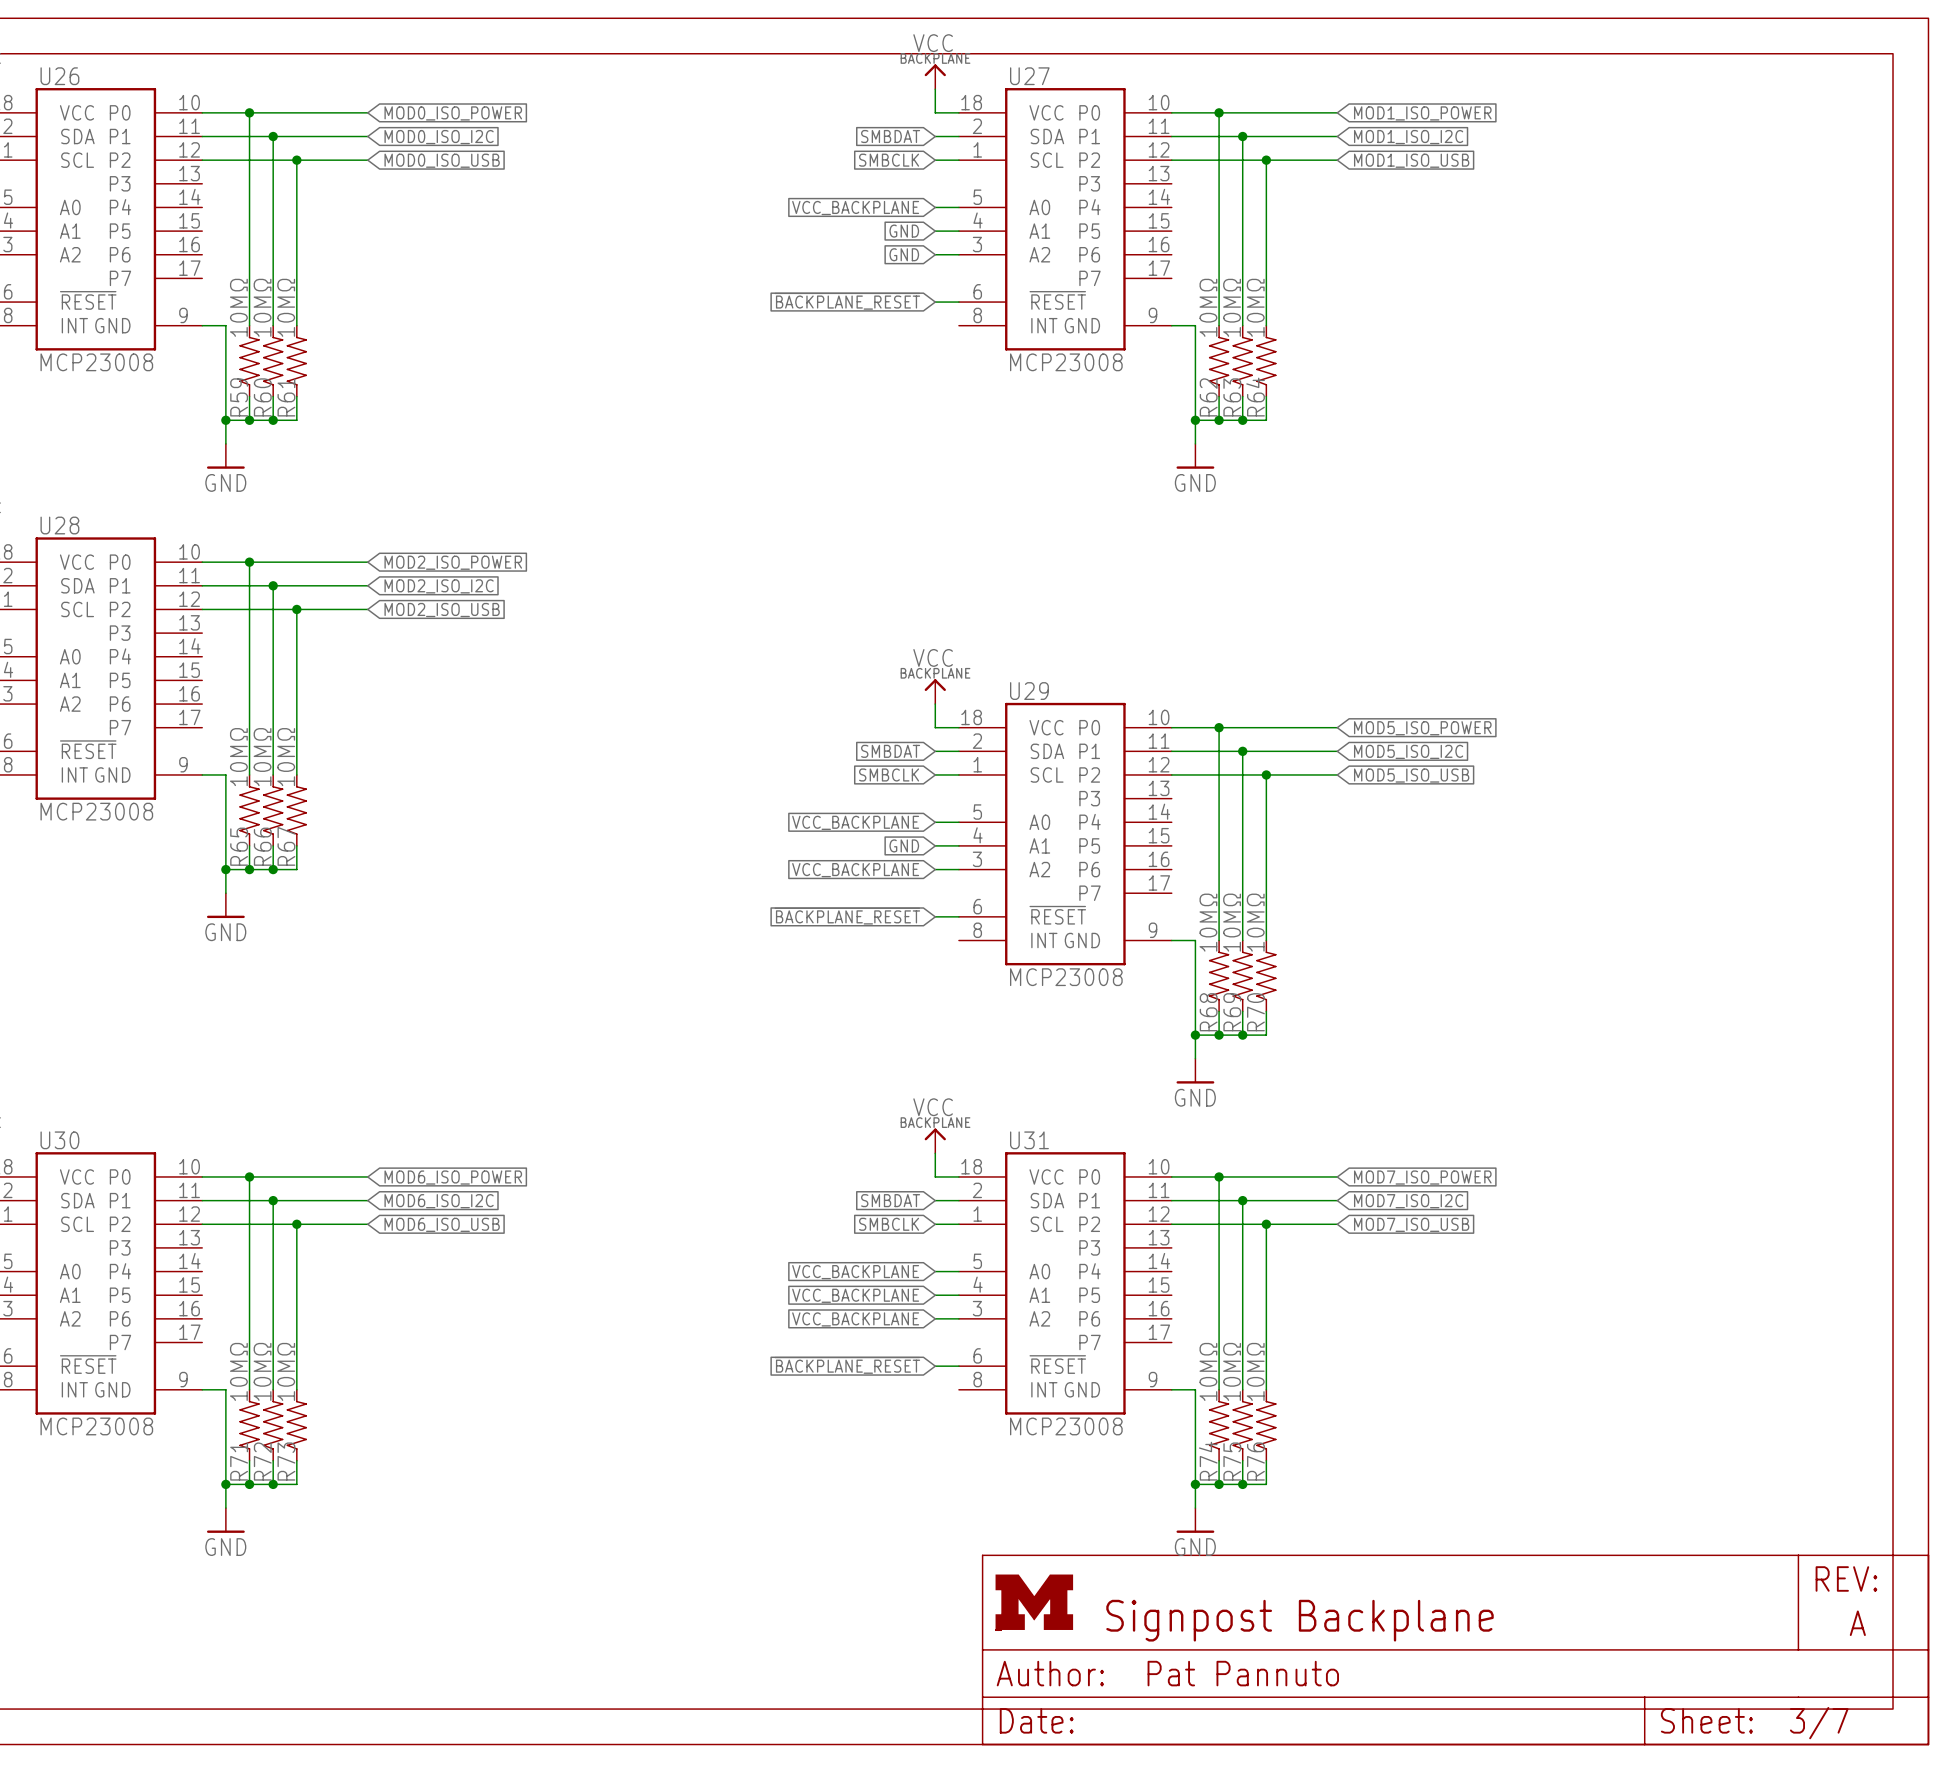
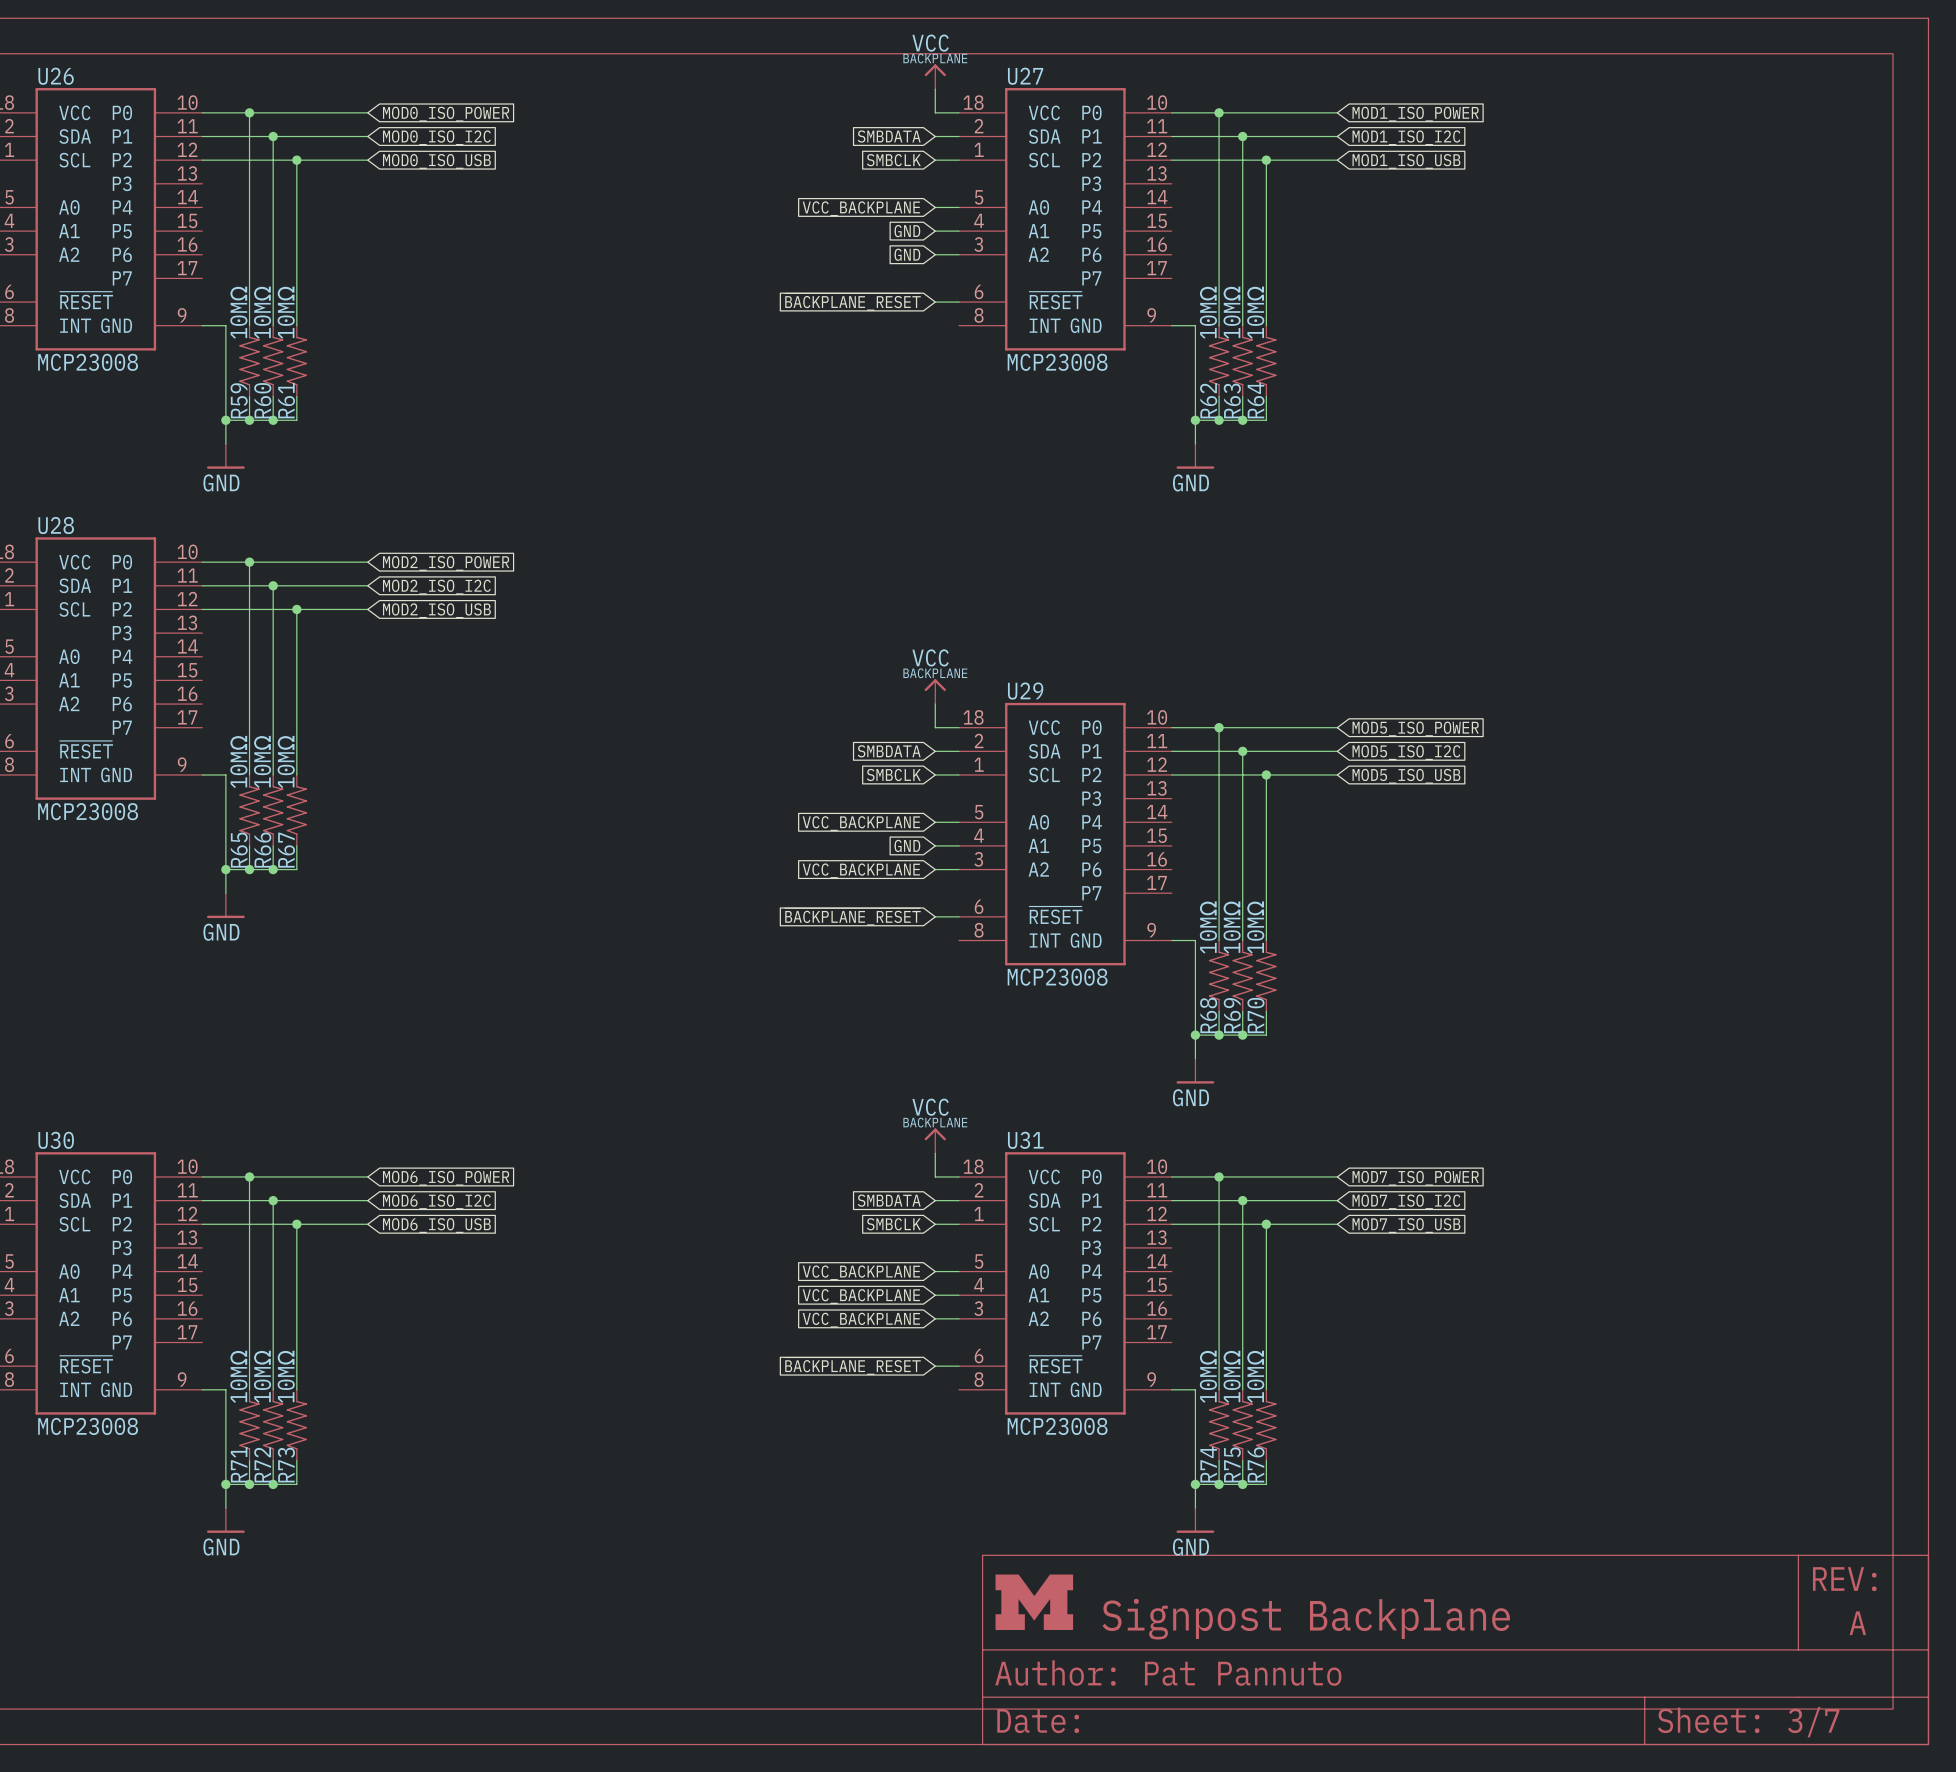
global label: SMBDAT (890, 136) -> SMBDATA (889, 136)
global label: SMBDAT (890, 751) -> SMBDATA (889, 751)
global label: SMBDAT (890, 1200) -> SMBDATA (889, 1200)

